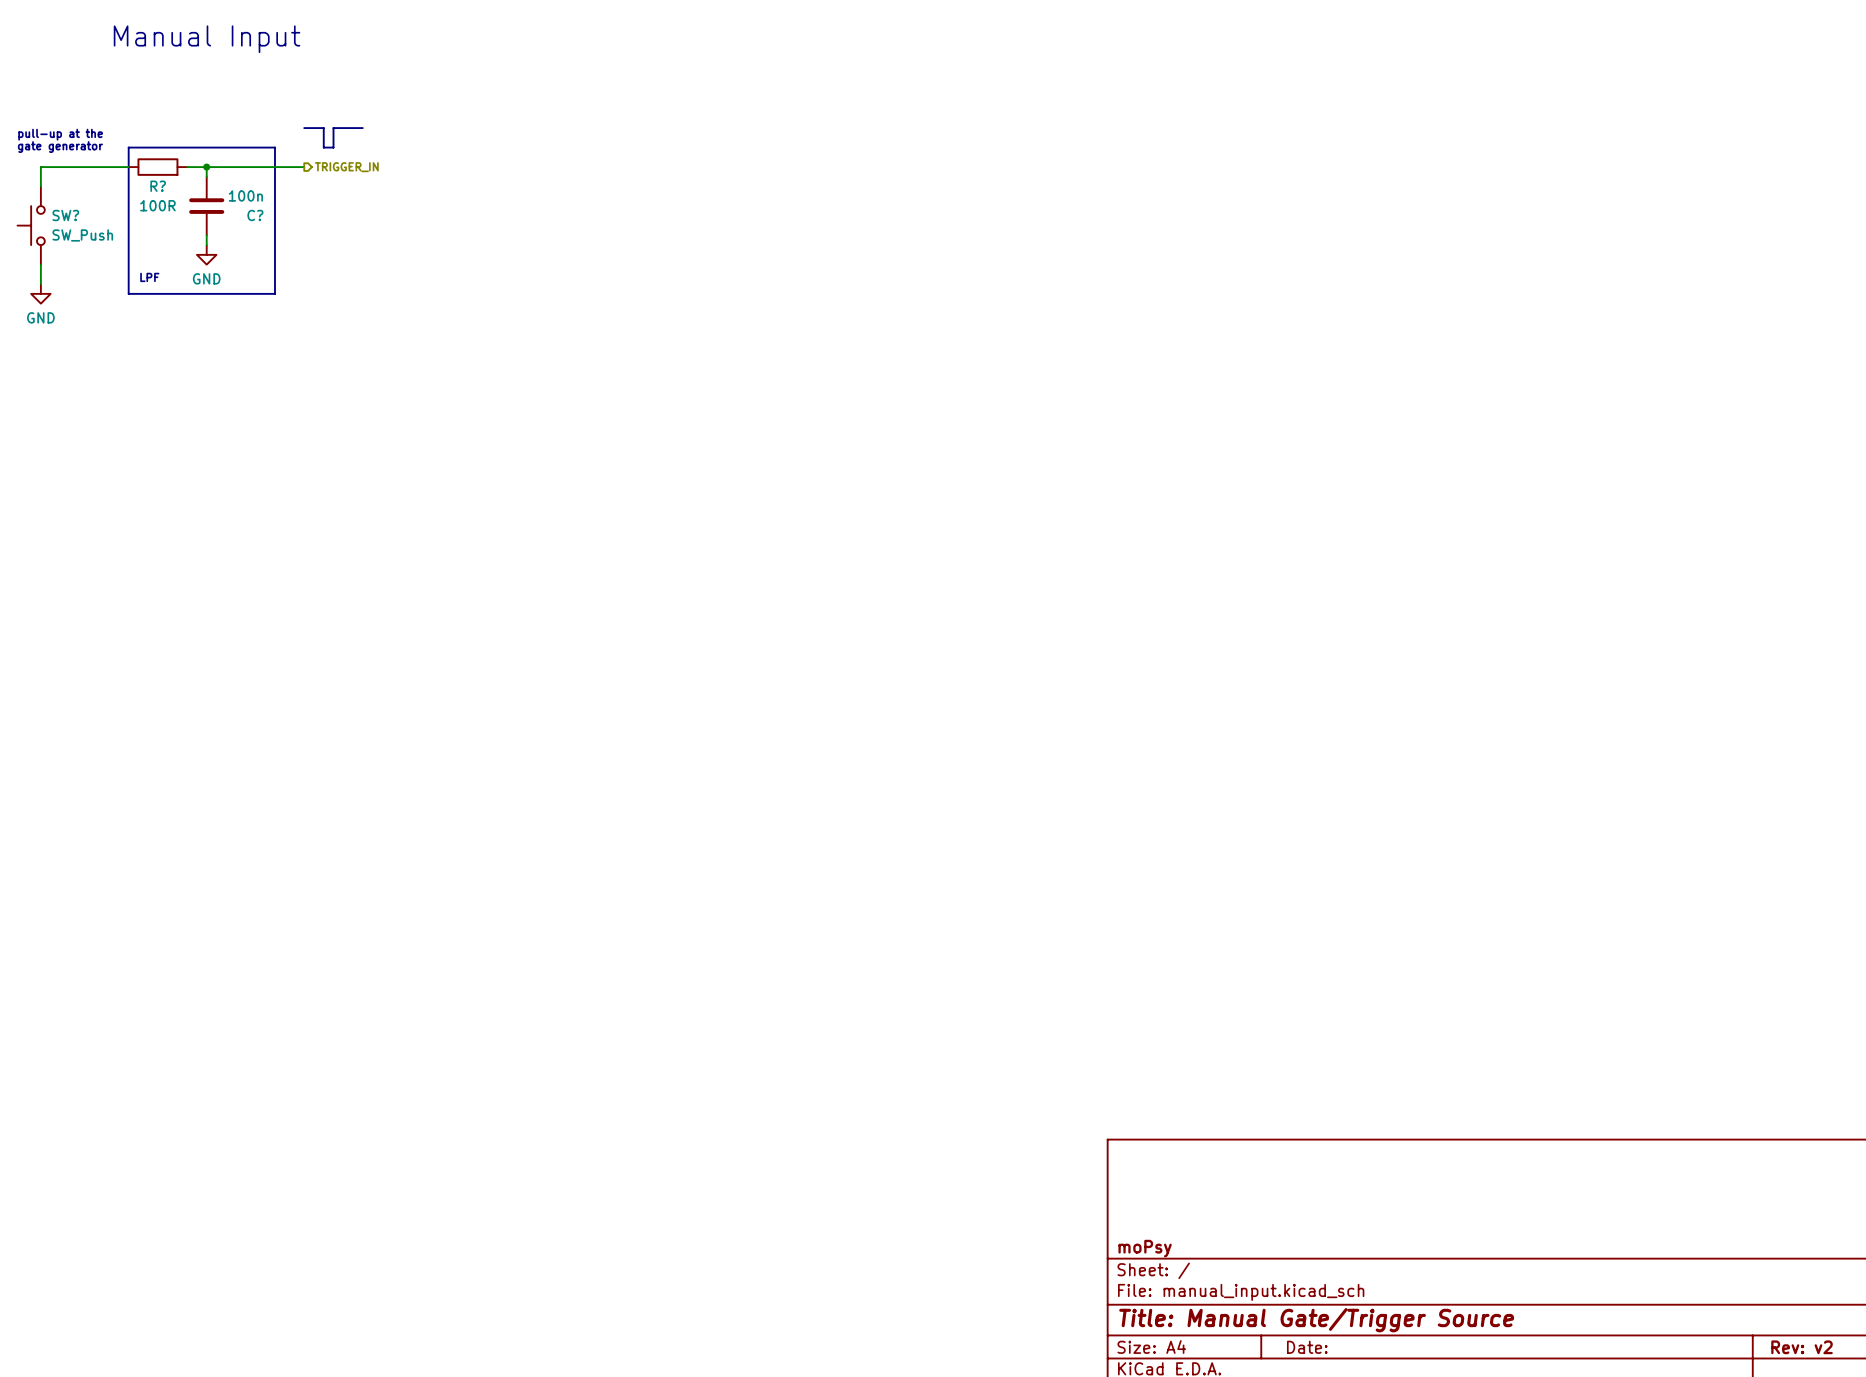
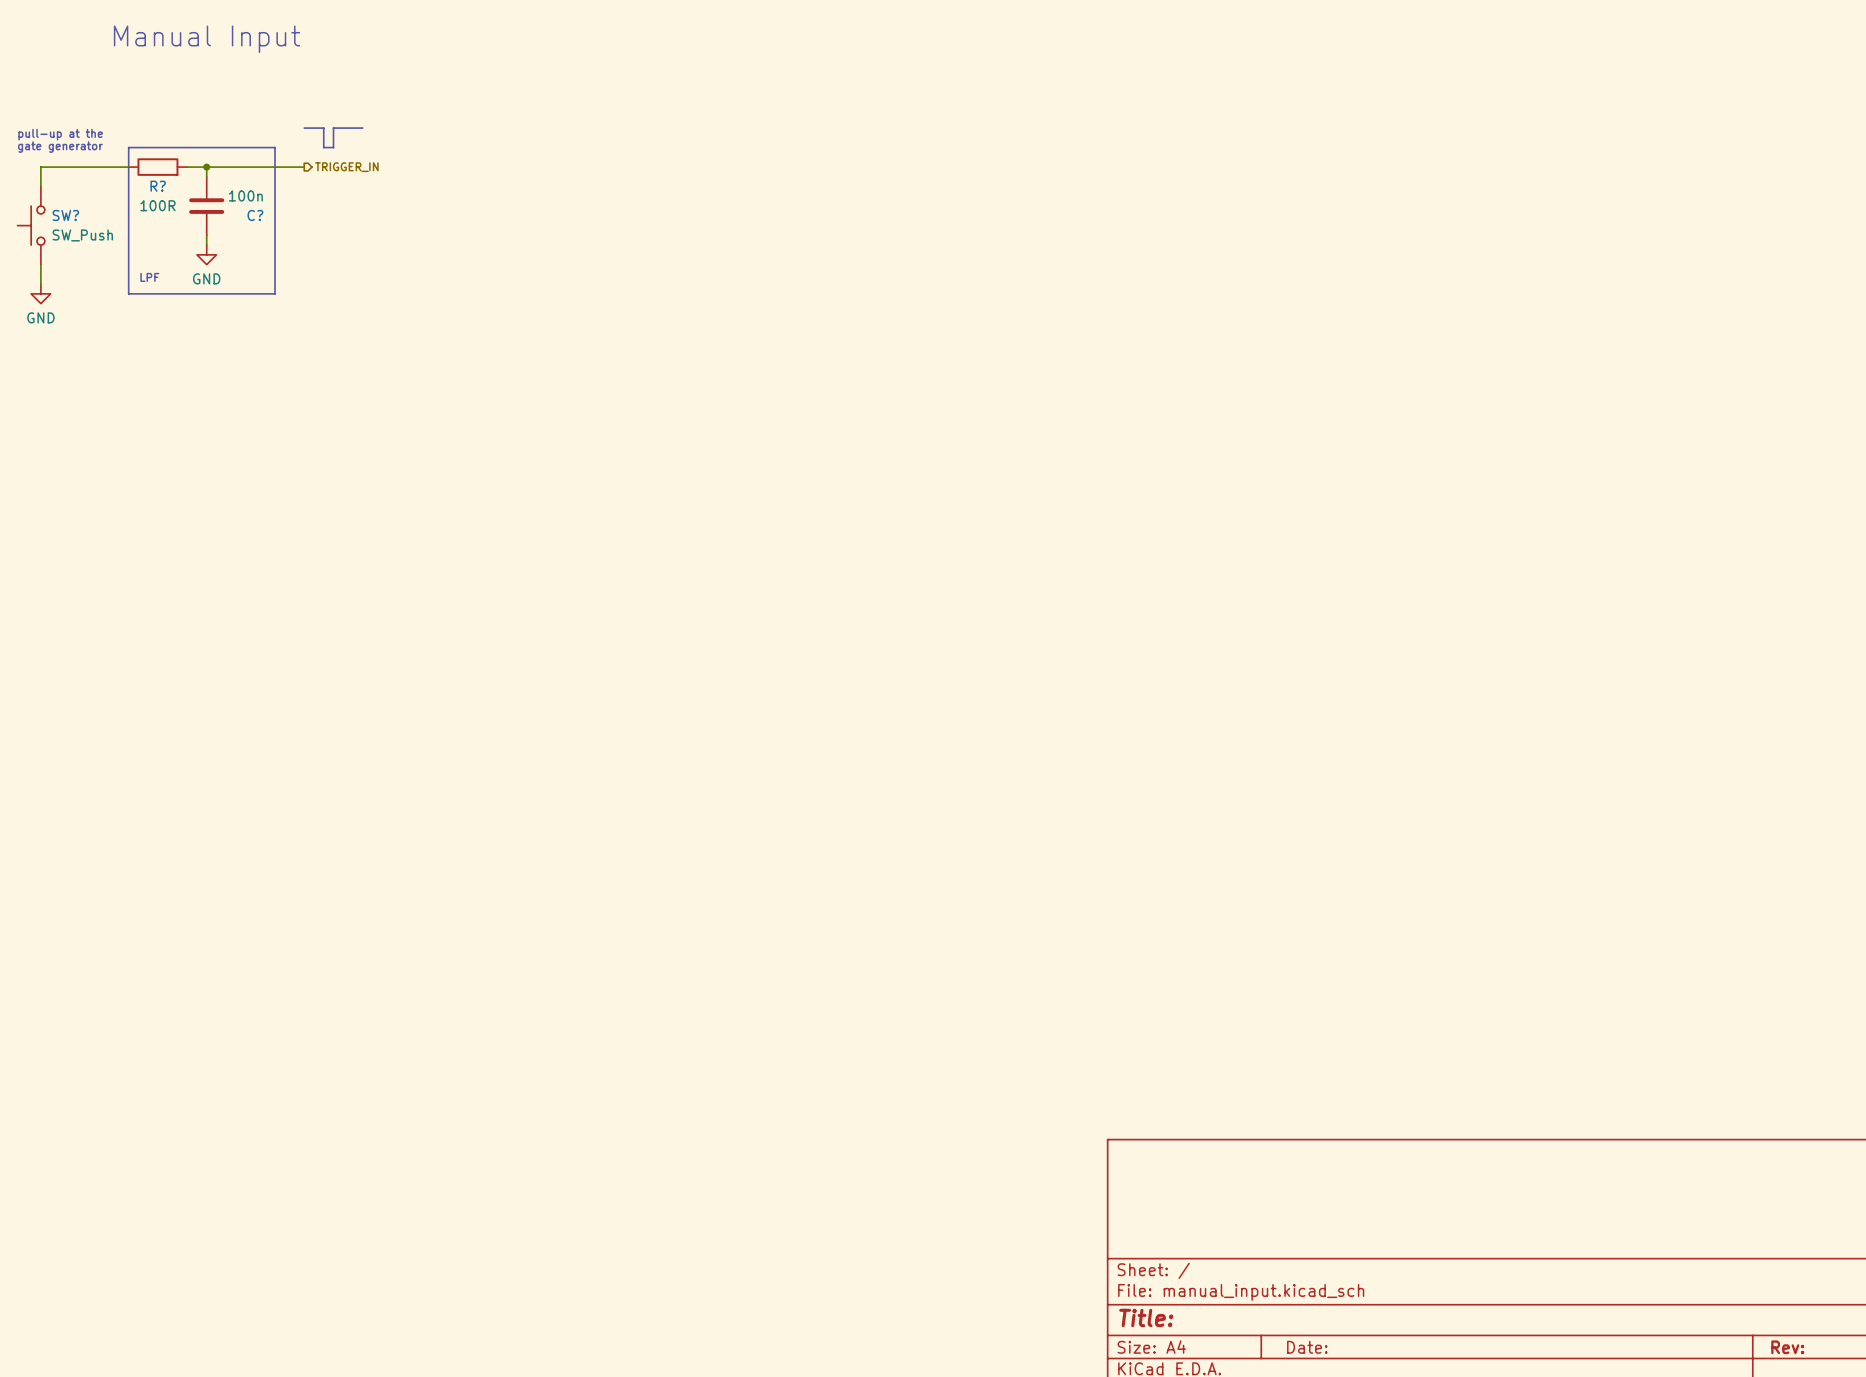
title block: moPsy (1145, 1248) -> none
title block: Title: Manual Gate/Trigger Source (1316, 1320) -> Title: (1146, 1317)
title block: Rev: v2 (1802, 1347) -> Rev: (1787, 1347)

